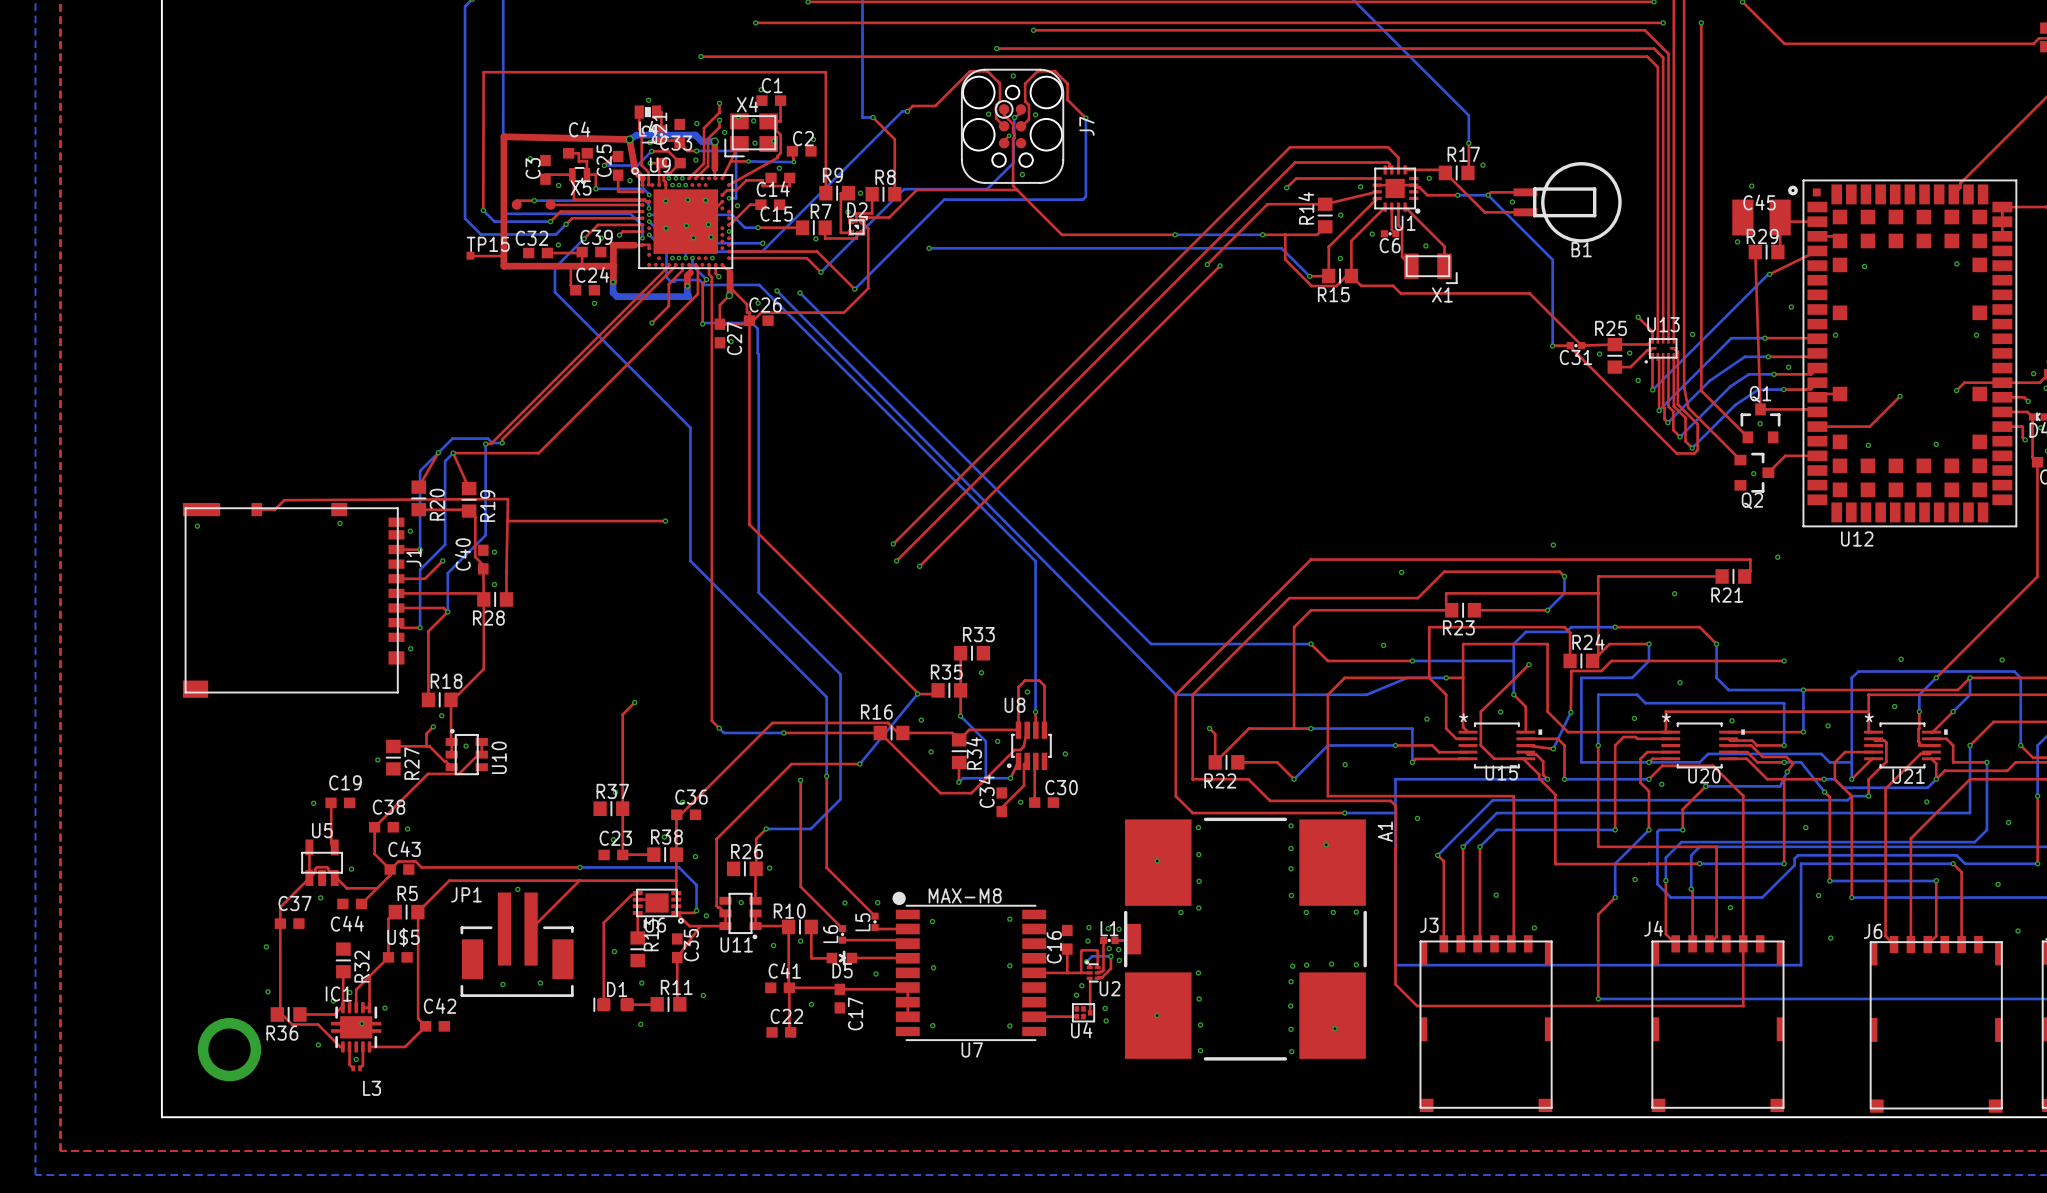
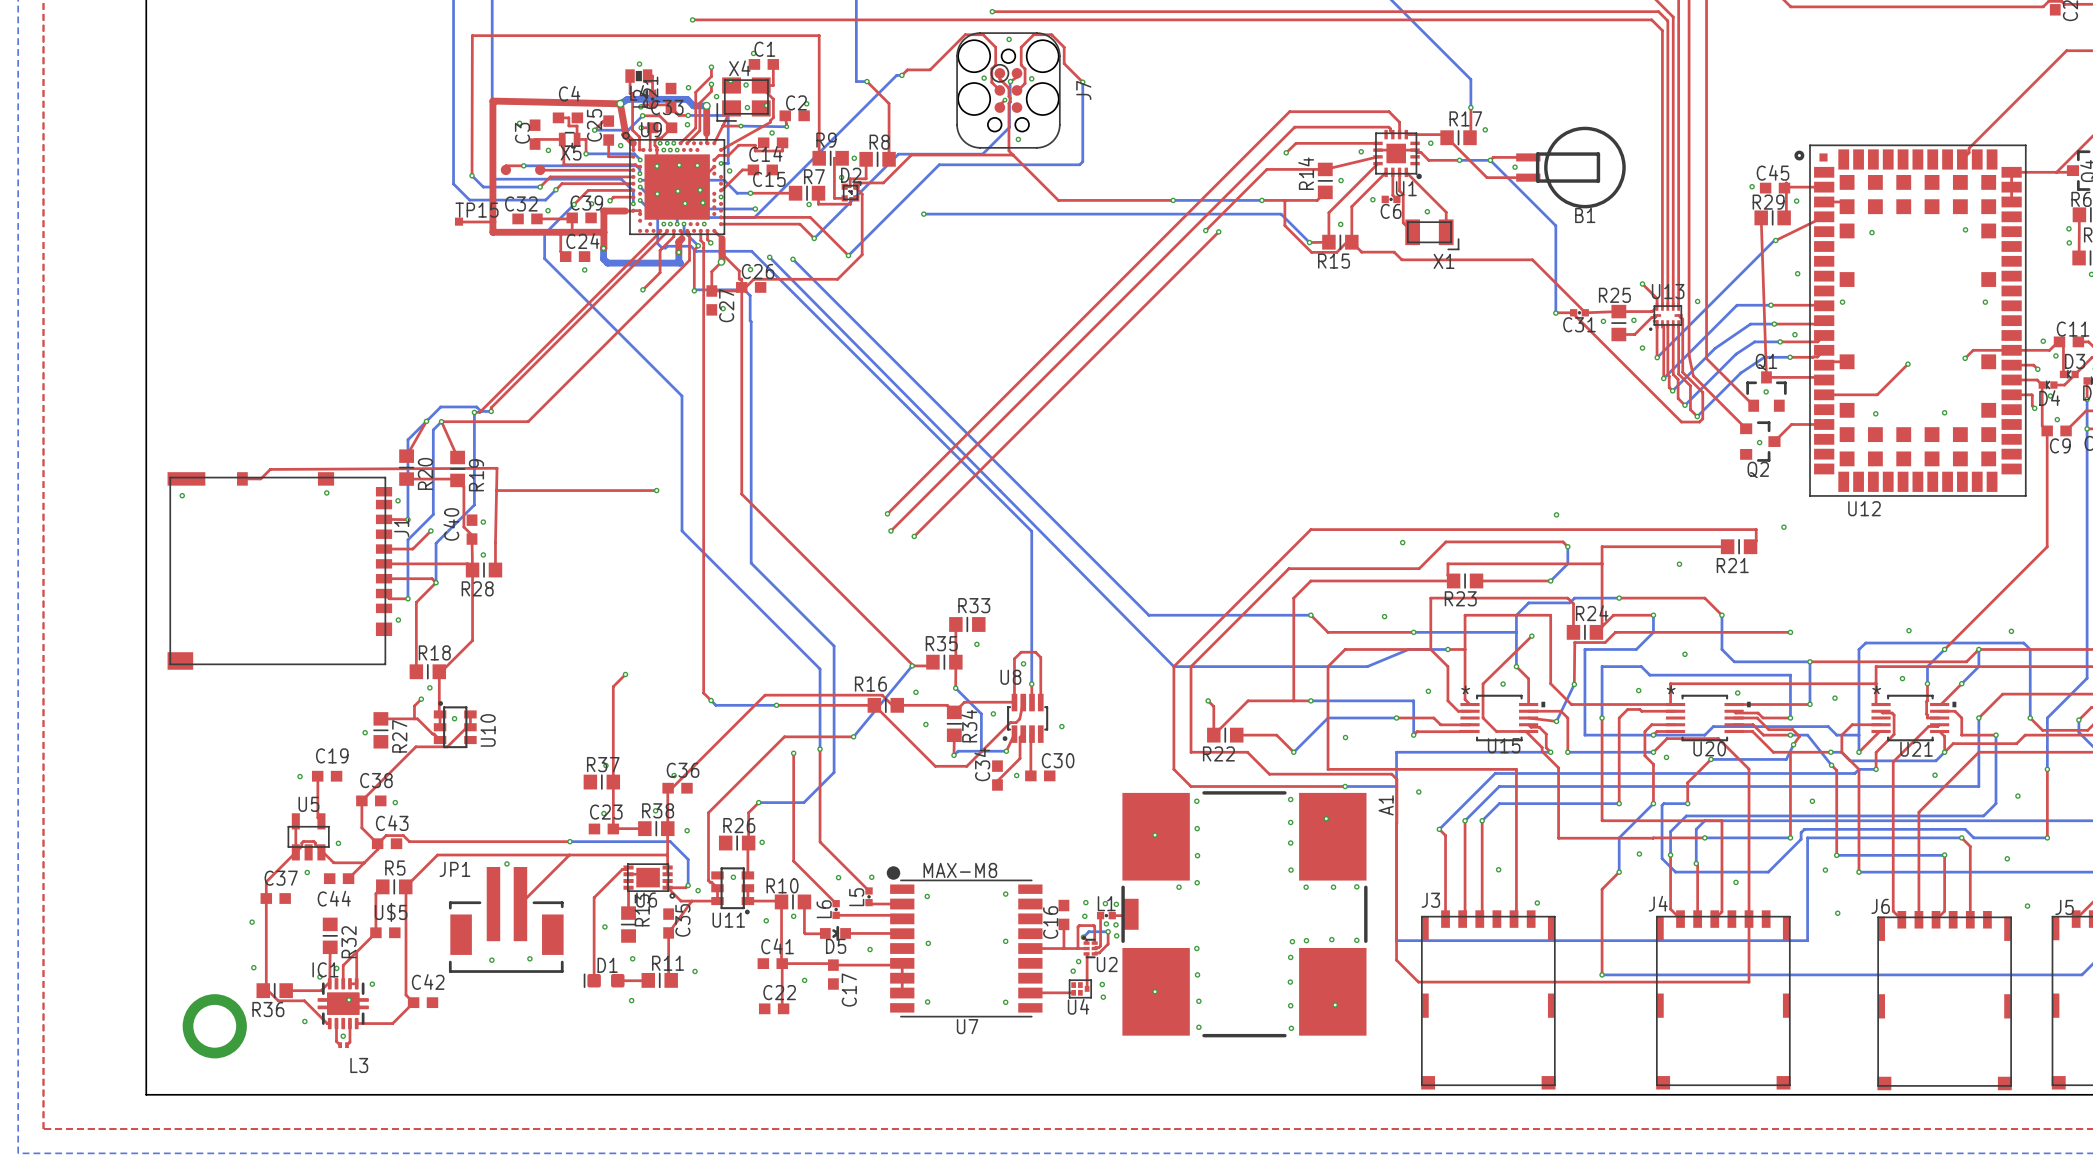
via: (1751, 186) -> none
C45 footprint: [1732, 199, 1791, 236] -> [1759, 182, 1791, 194]
via: none -> (1752, 186)
via: none -> (1796, 201)
via: (1737, 241) -> none

